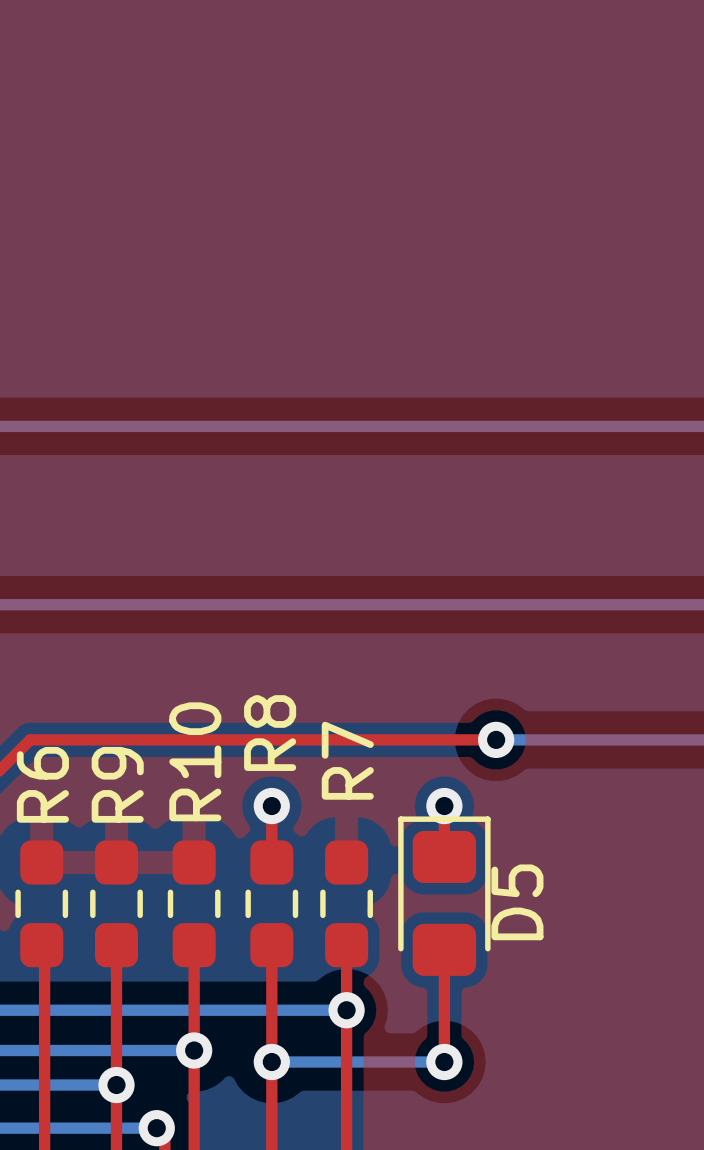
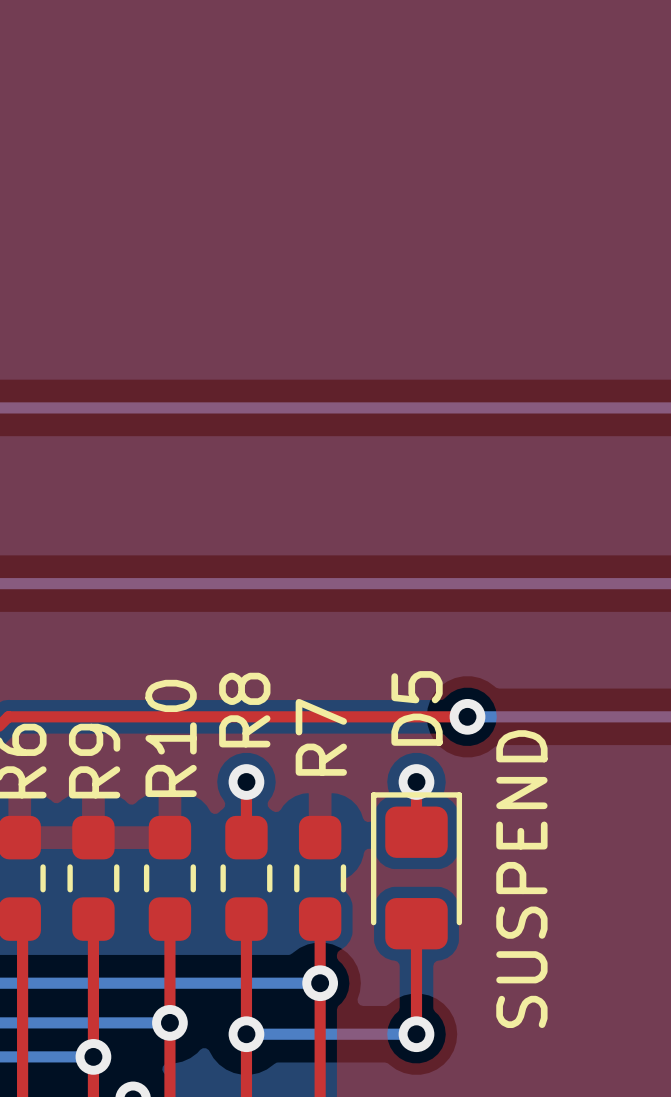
D5 name position: D5 (517, 902) -> D5 (417, 708)
text: none -> SUSPEND (521, 879)

